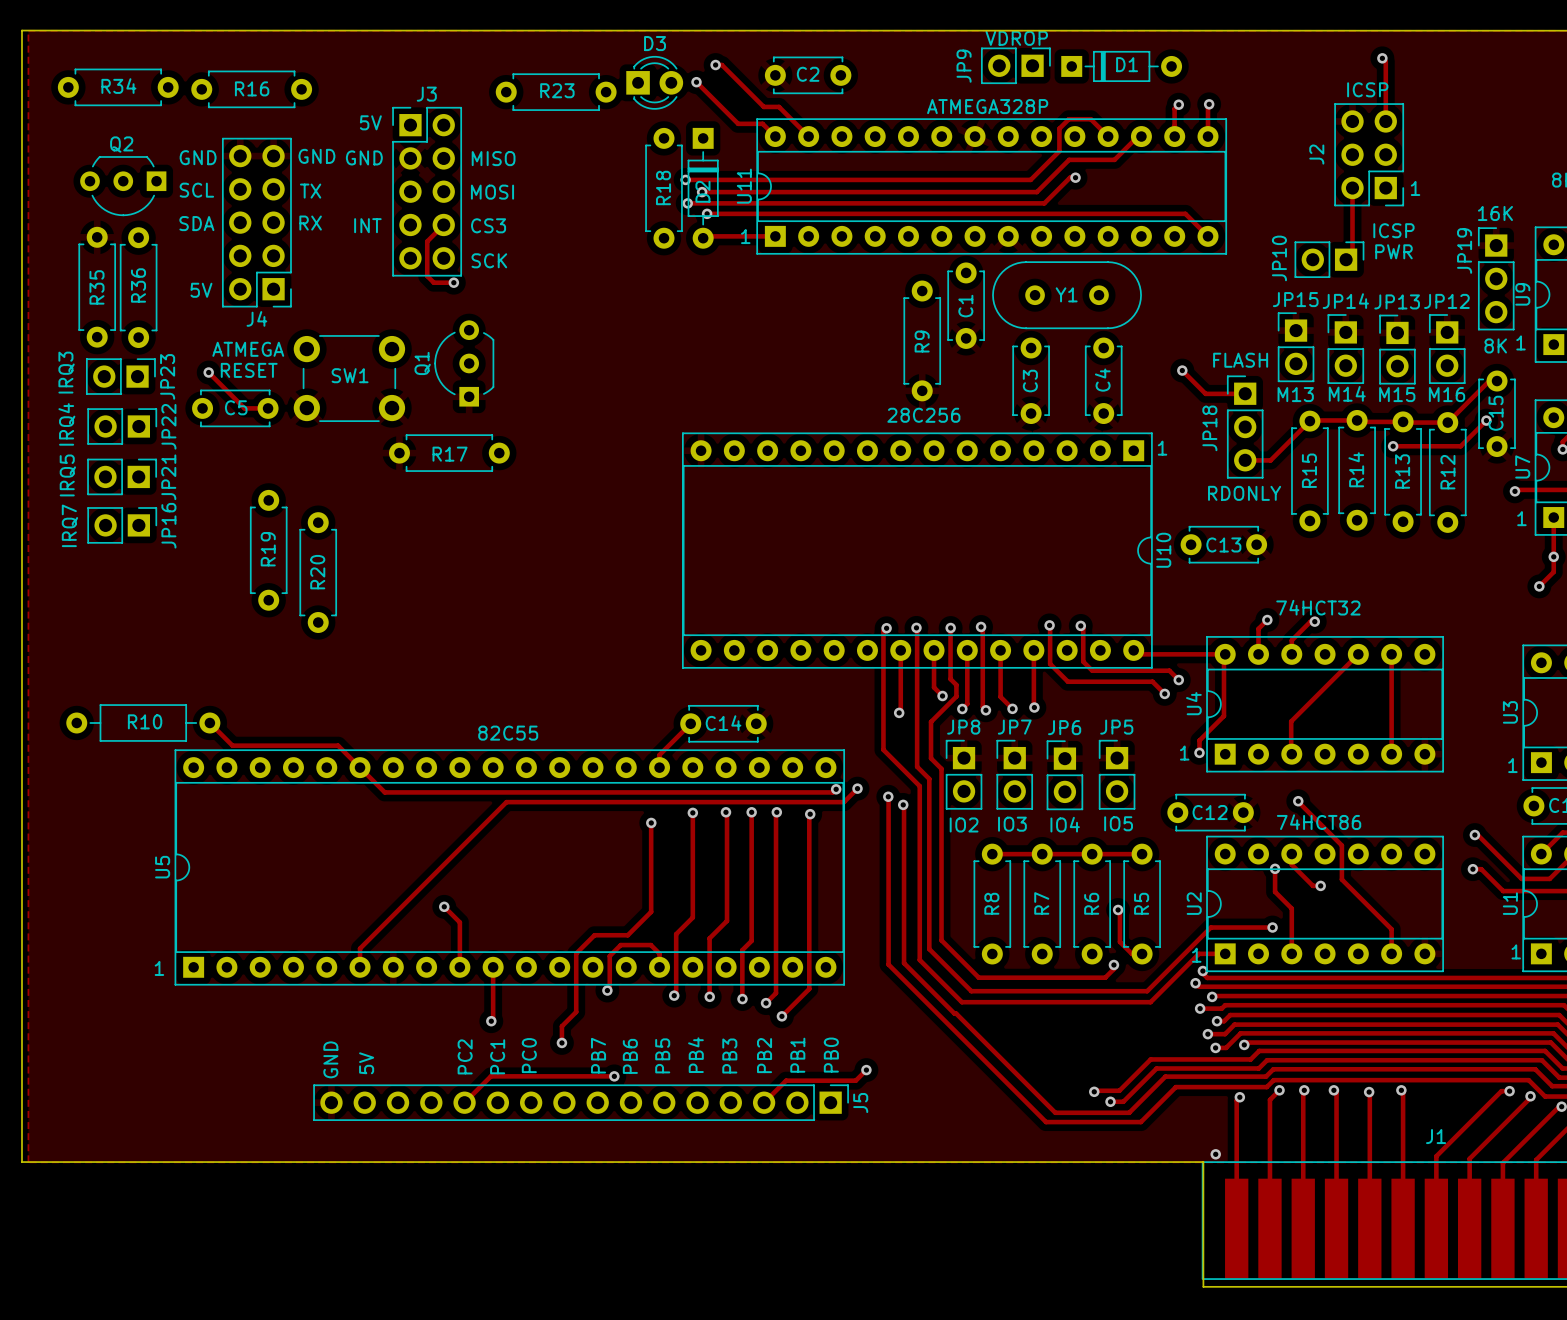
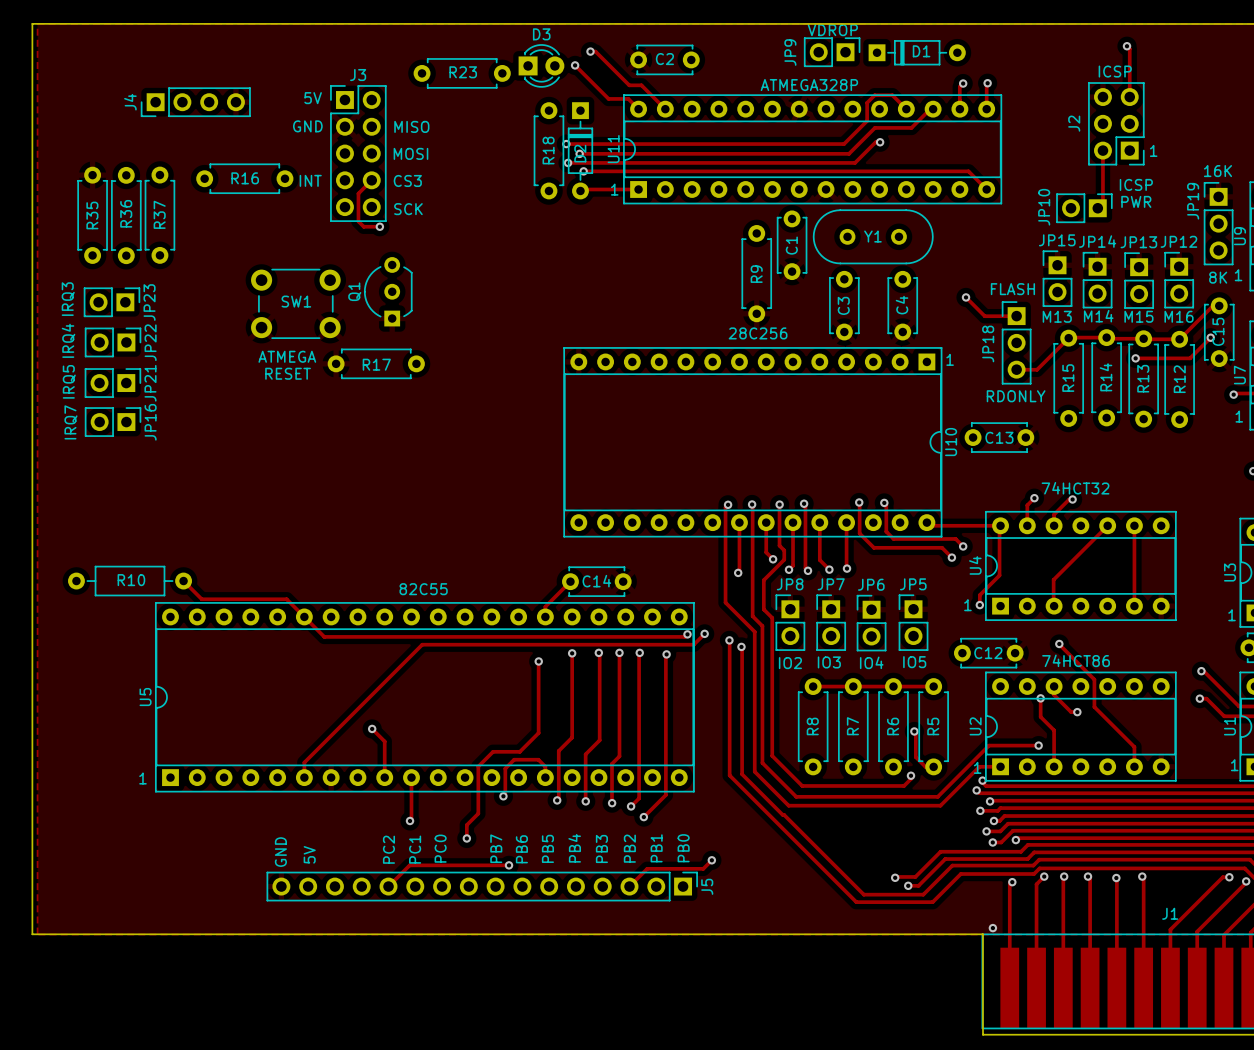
R34: (118, 87) -> none
R16 position: (251, 89) -> (244, 178)
J4 footprint: [222, 137, 292, 308] -> [140, 87, 251, 117]
text: GND (316, 156) -> none
text: GND (198, 157) -> none
Q2: (123, 186) -> none
text: SCL (196, 190) -> none
text: TX (310, 191) -> none
text: SDA (196, 223) -> none
text: RX (310, 223) -> none
R37: none -> (159, 215)
R35 position: (97, 287) -> (92, 215)
R36 position: (138, 287) -> (126, 215)
text: 5V (201, 290) -> none
J4 name position: J4 (256, 318) -> J4 (130, 102)
text position: ATMEGA (248, 349) -> ATMEGA (287, 356)
text position: RESET (249, 370) -> RESET (288, 373)
track: (208, 372) (244, 408) (268, 408) -> none
via: (208, 372) -> none
C5: (235, 408) -> none
R19: (268, 550) -> none
R20: (318, 572) -> none

